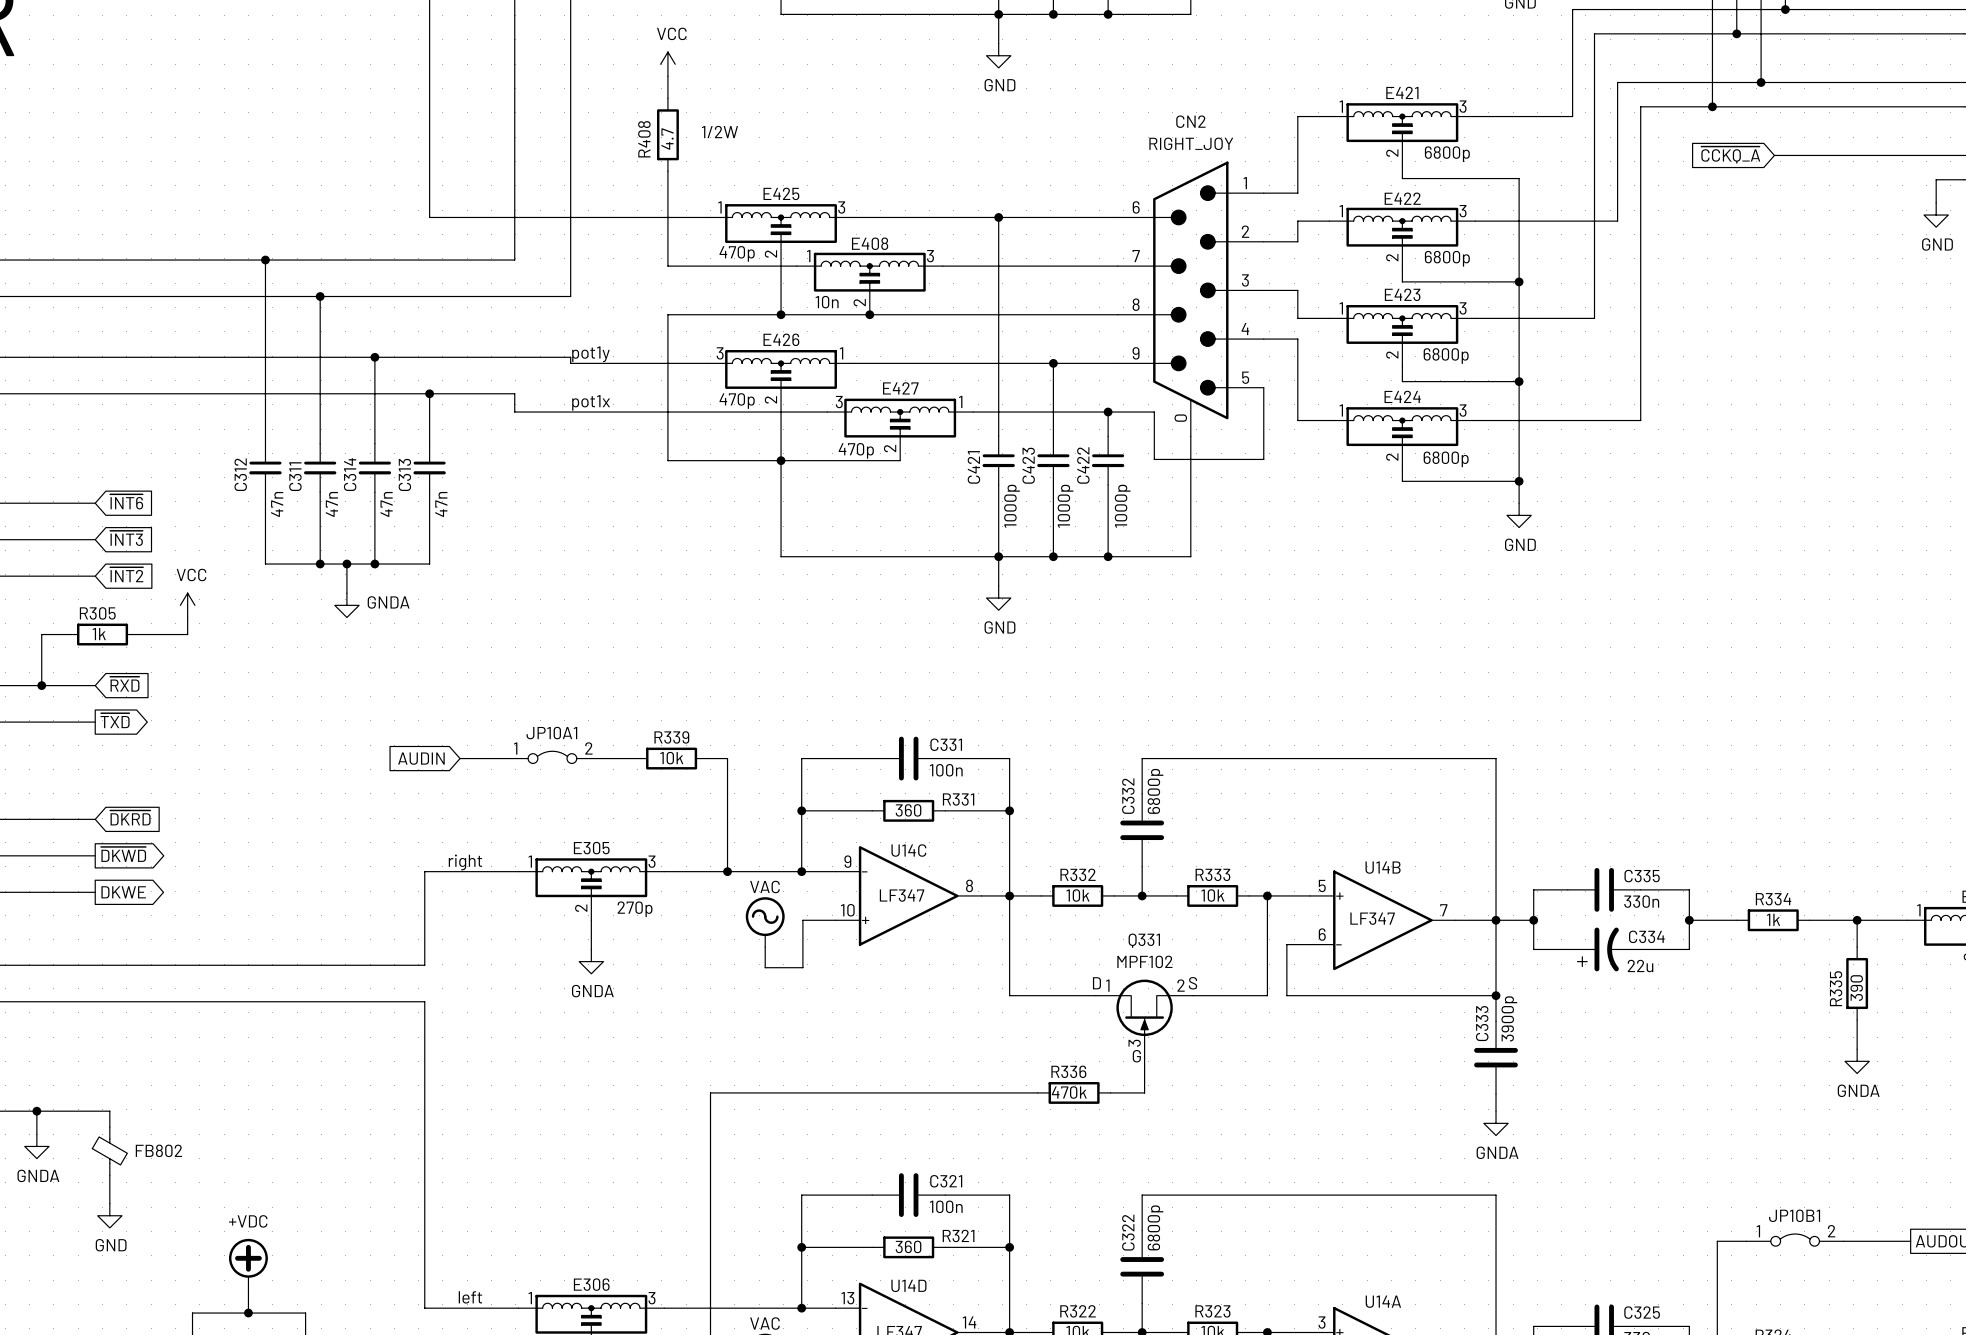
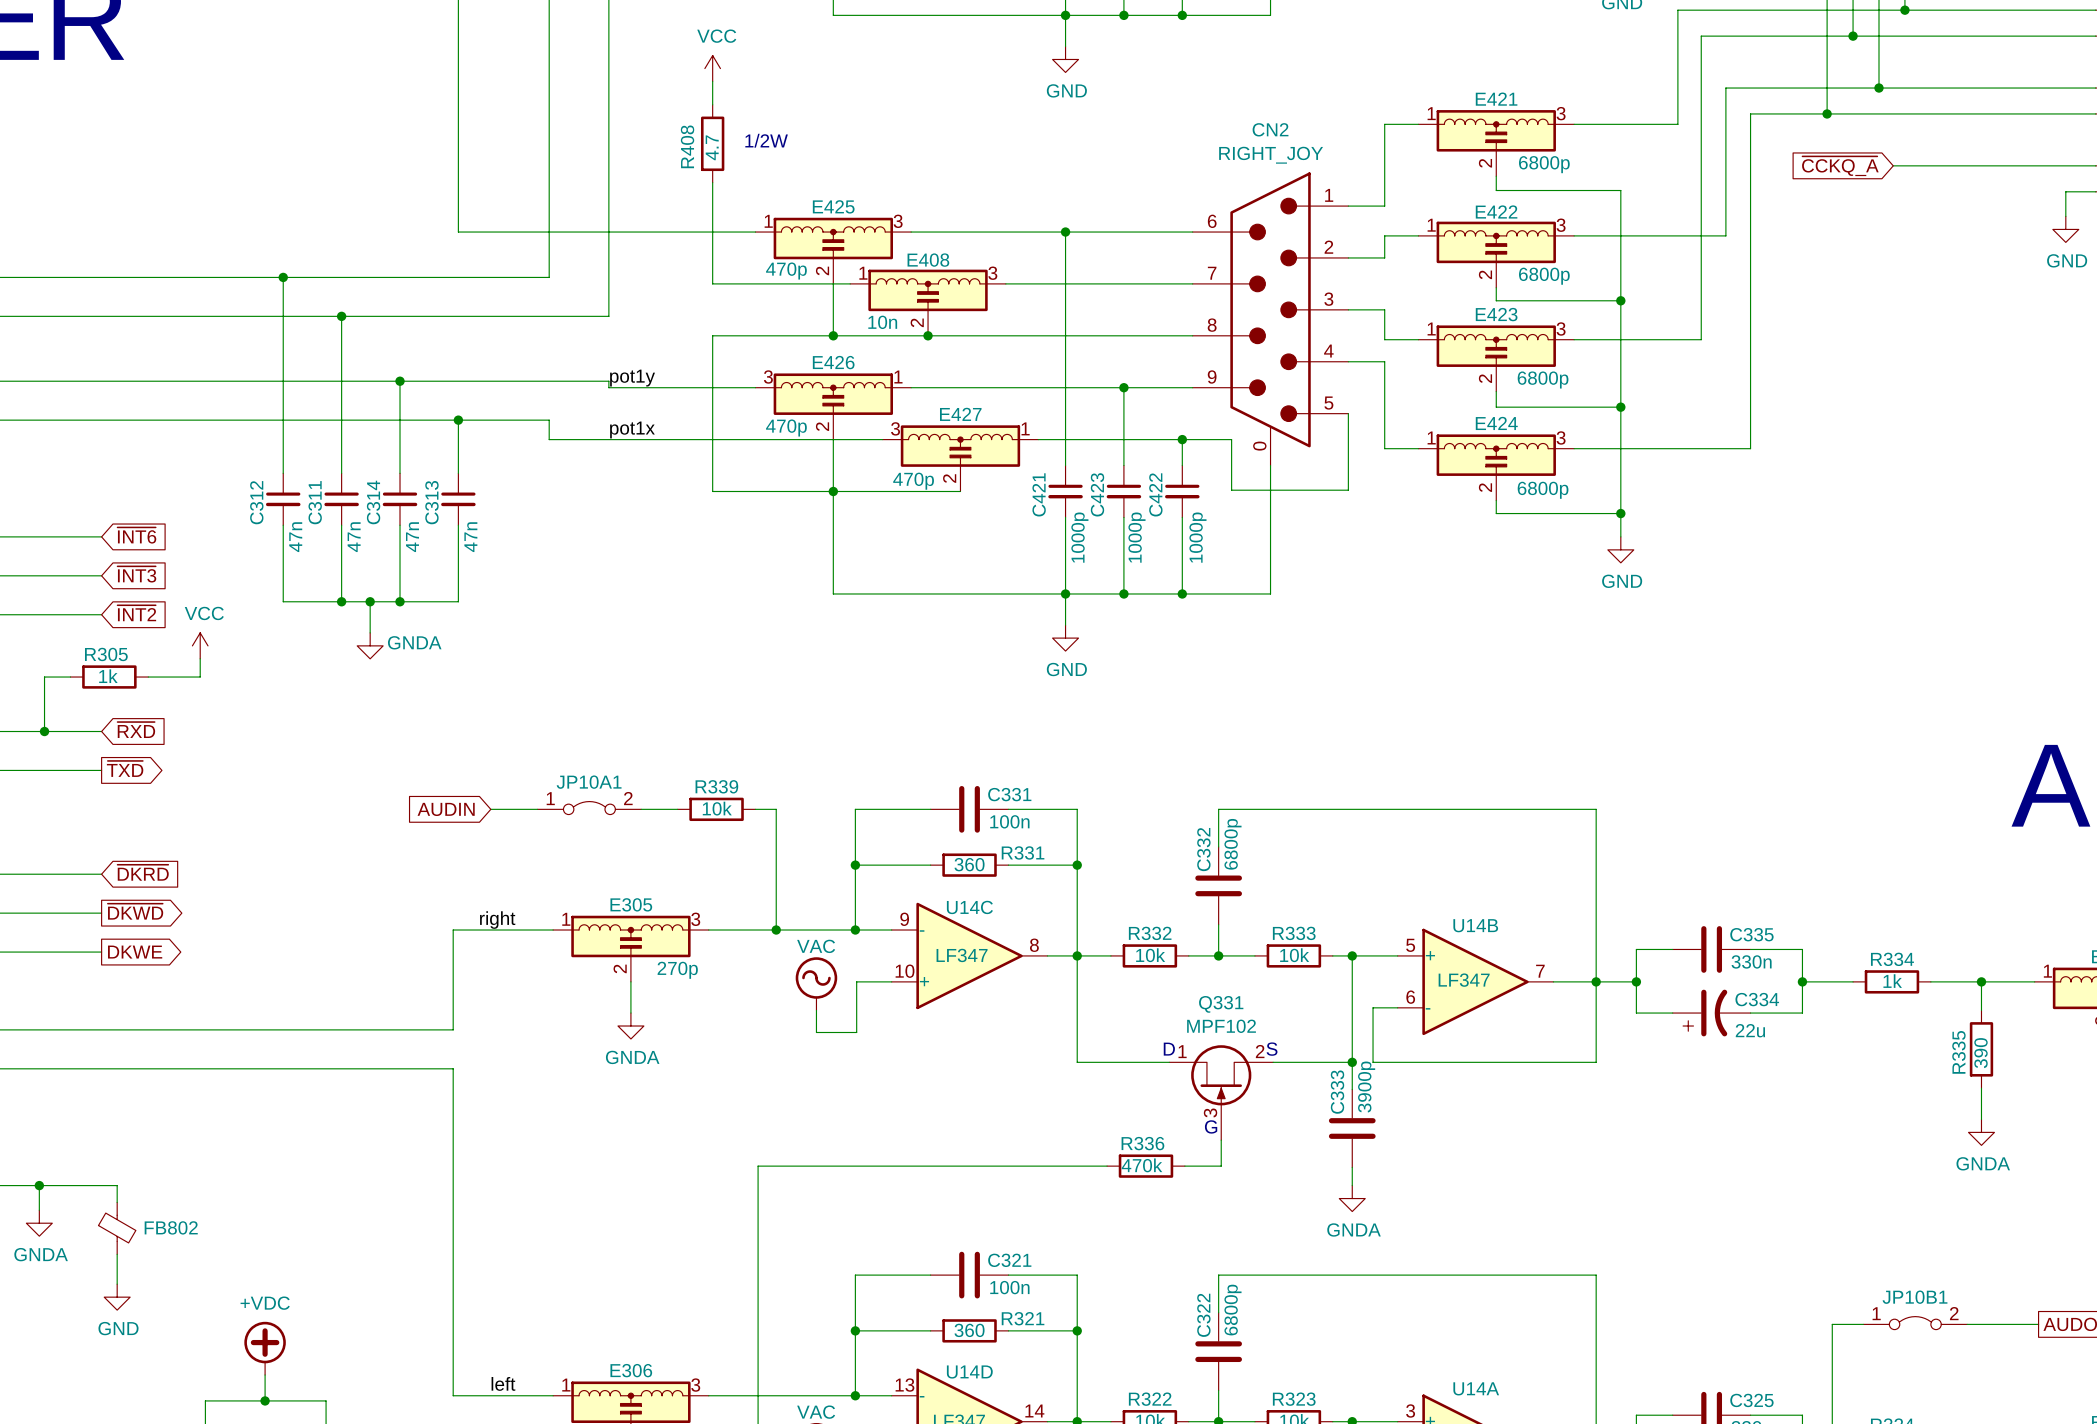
junction: none -> (1352, 1062)
wire: (1496, 995) (1496, 1021) -> (1352, 1062) (1352, 1089)
junction: (1496, 995) -> none
C333 position: (1496, 1057) -> (1352, 1128)
wire: (1496, 1094) (1496, 1111) -> (1352, 1167) (1352, 1185)
power symbol position: GNDA (1496, 1123) -> GNDA (1352, 1198)

